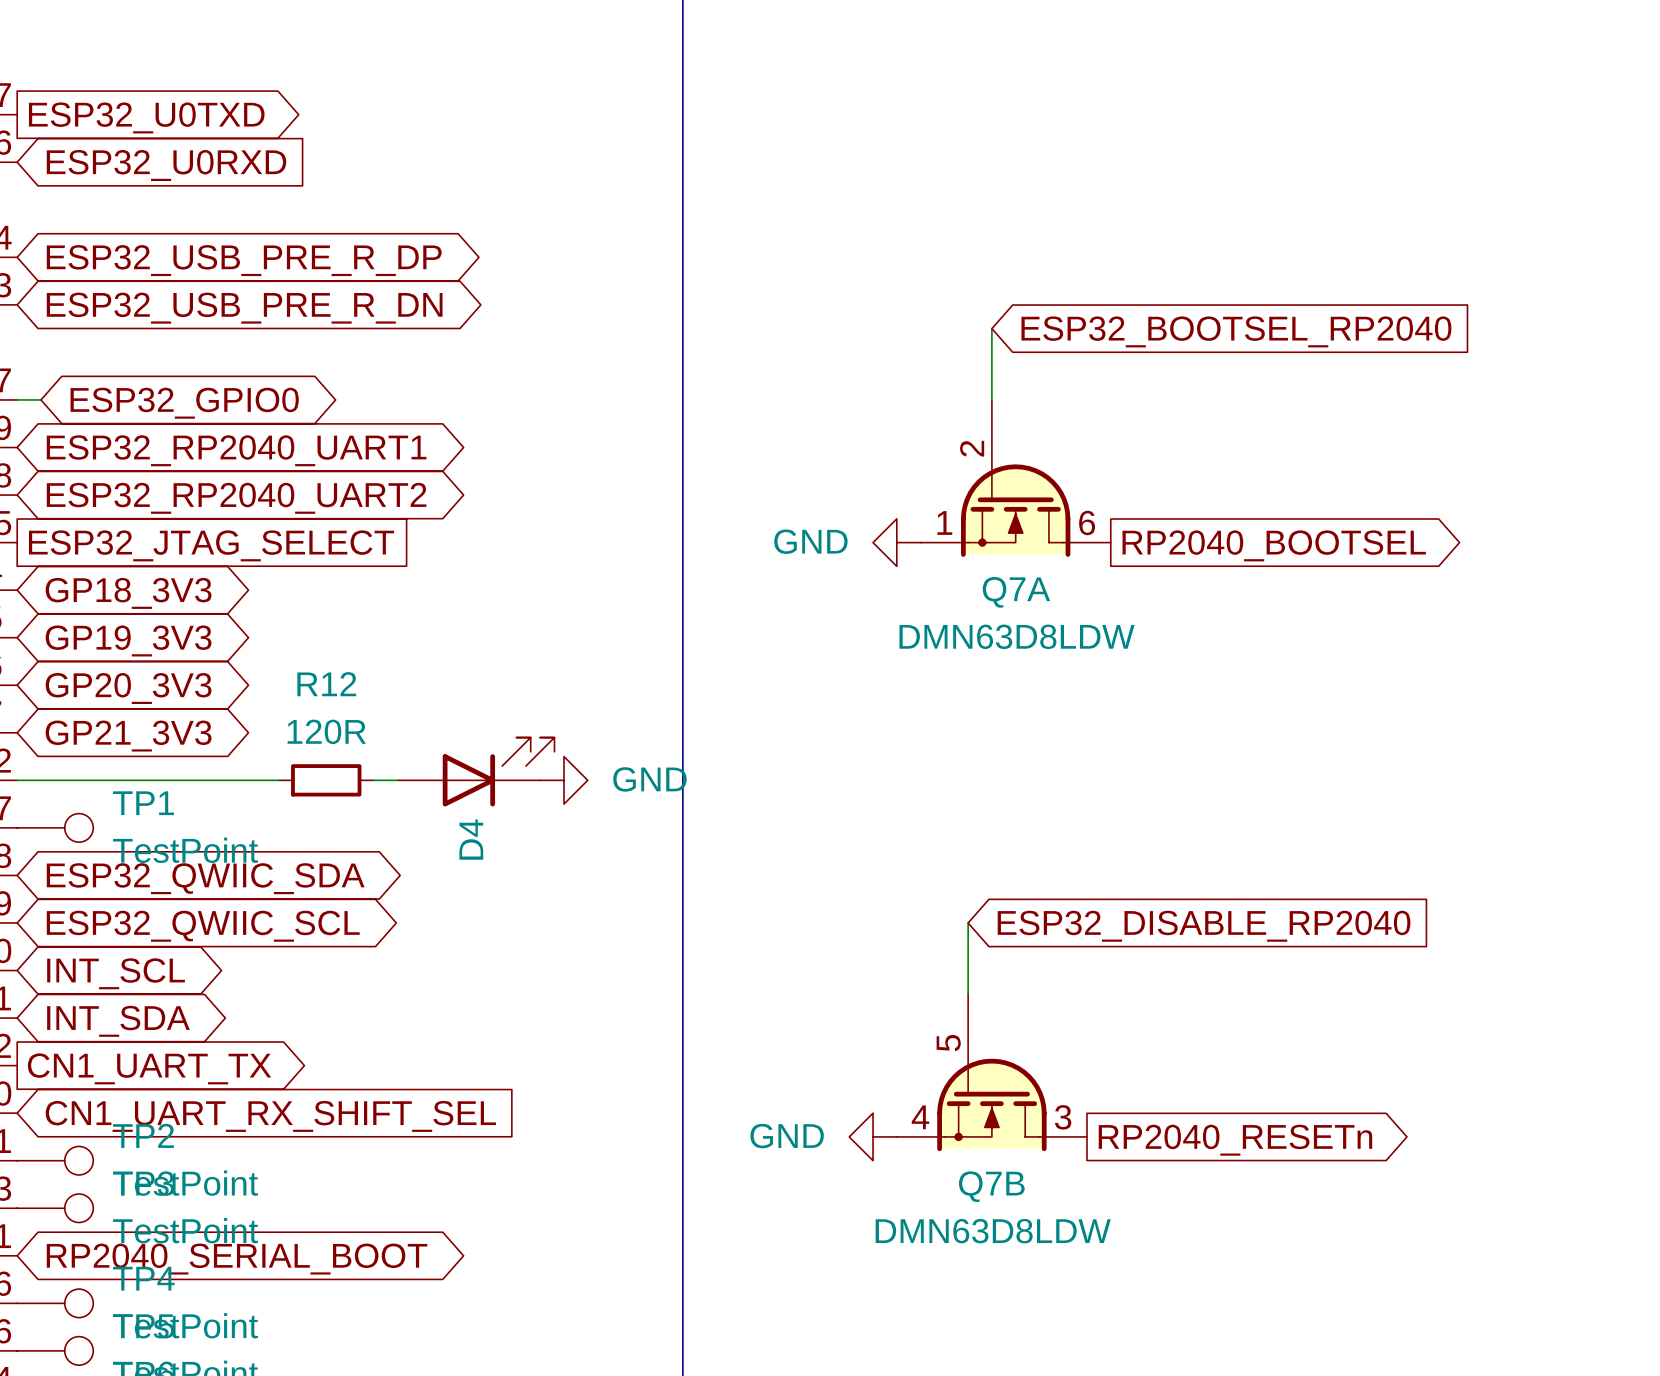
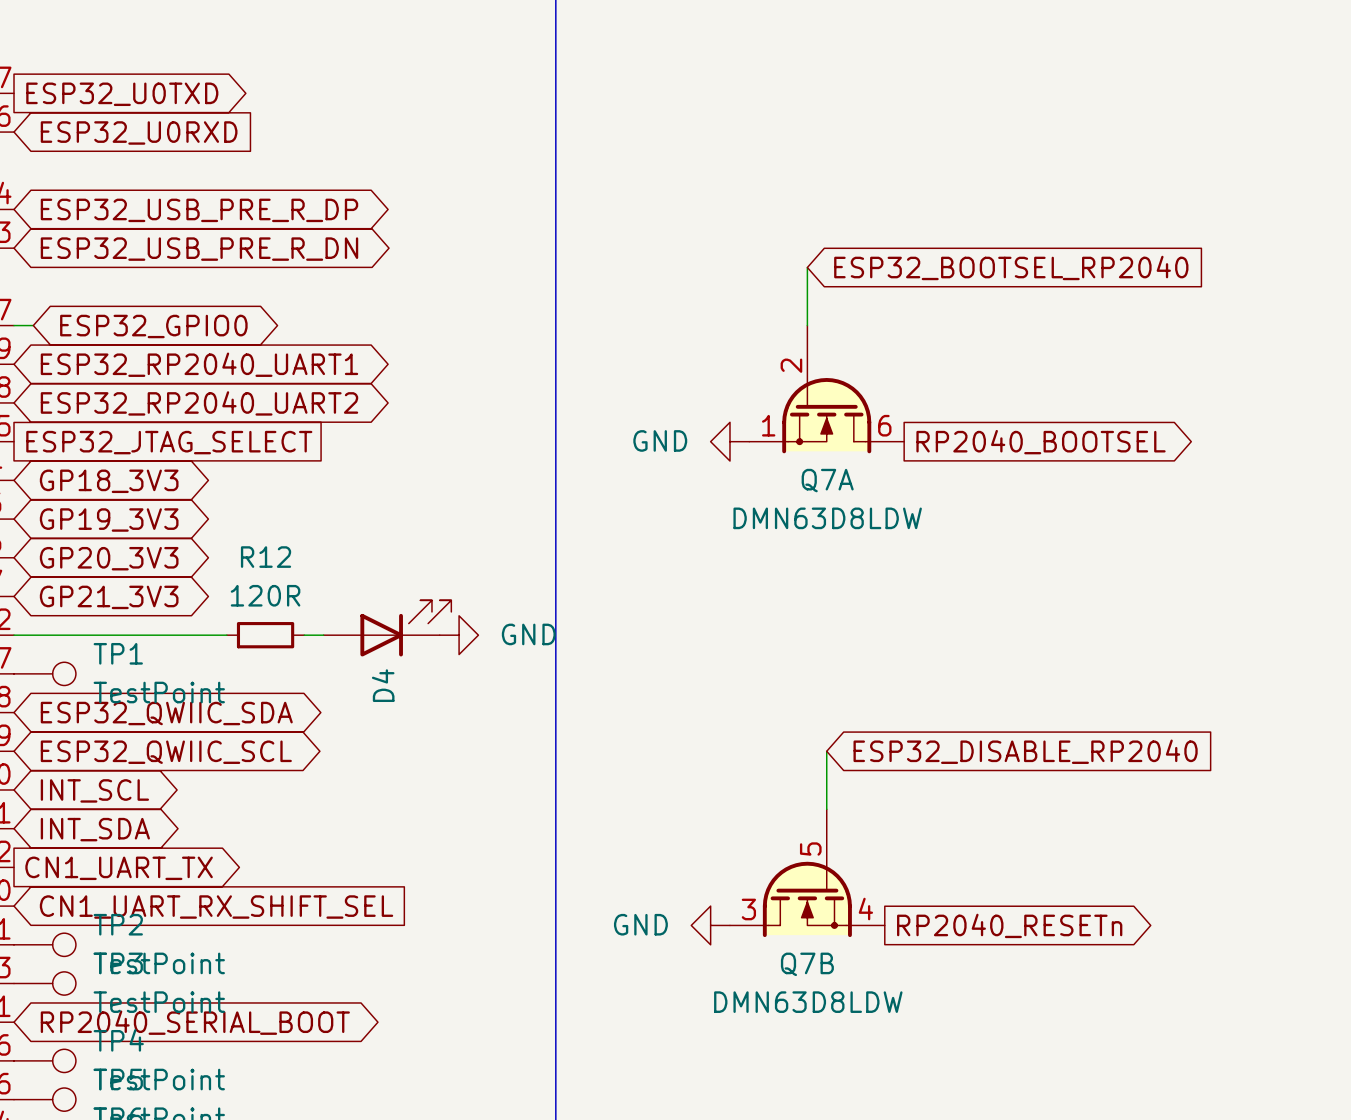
wire: (968, 922) (968, 994) -> (826, 751) (826, 809)
global label position: ESP32_DISABLE_RP2040 (1204, 926) -> ESP32_DISABLE_RP2040 (1025, 751)
Q7B flip: as is (991, 1104) -> left-right (807, 899)

